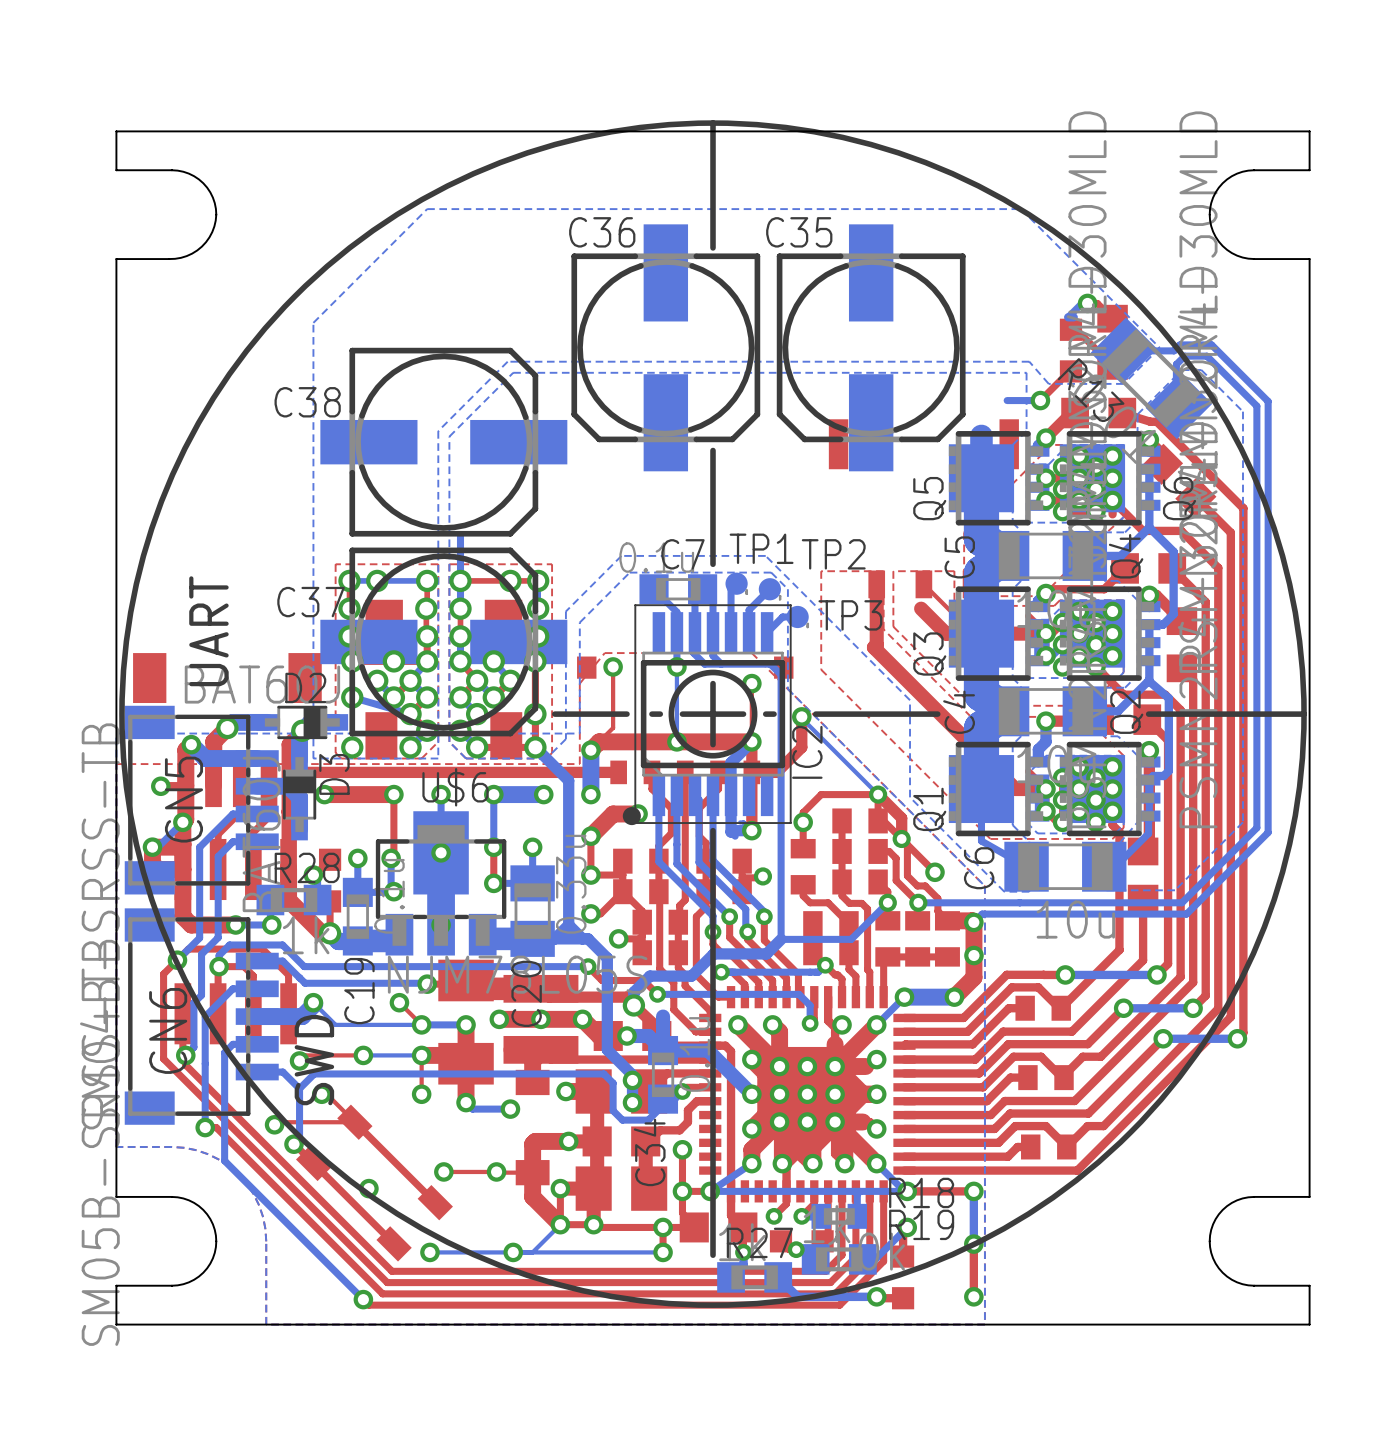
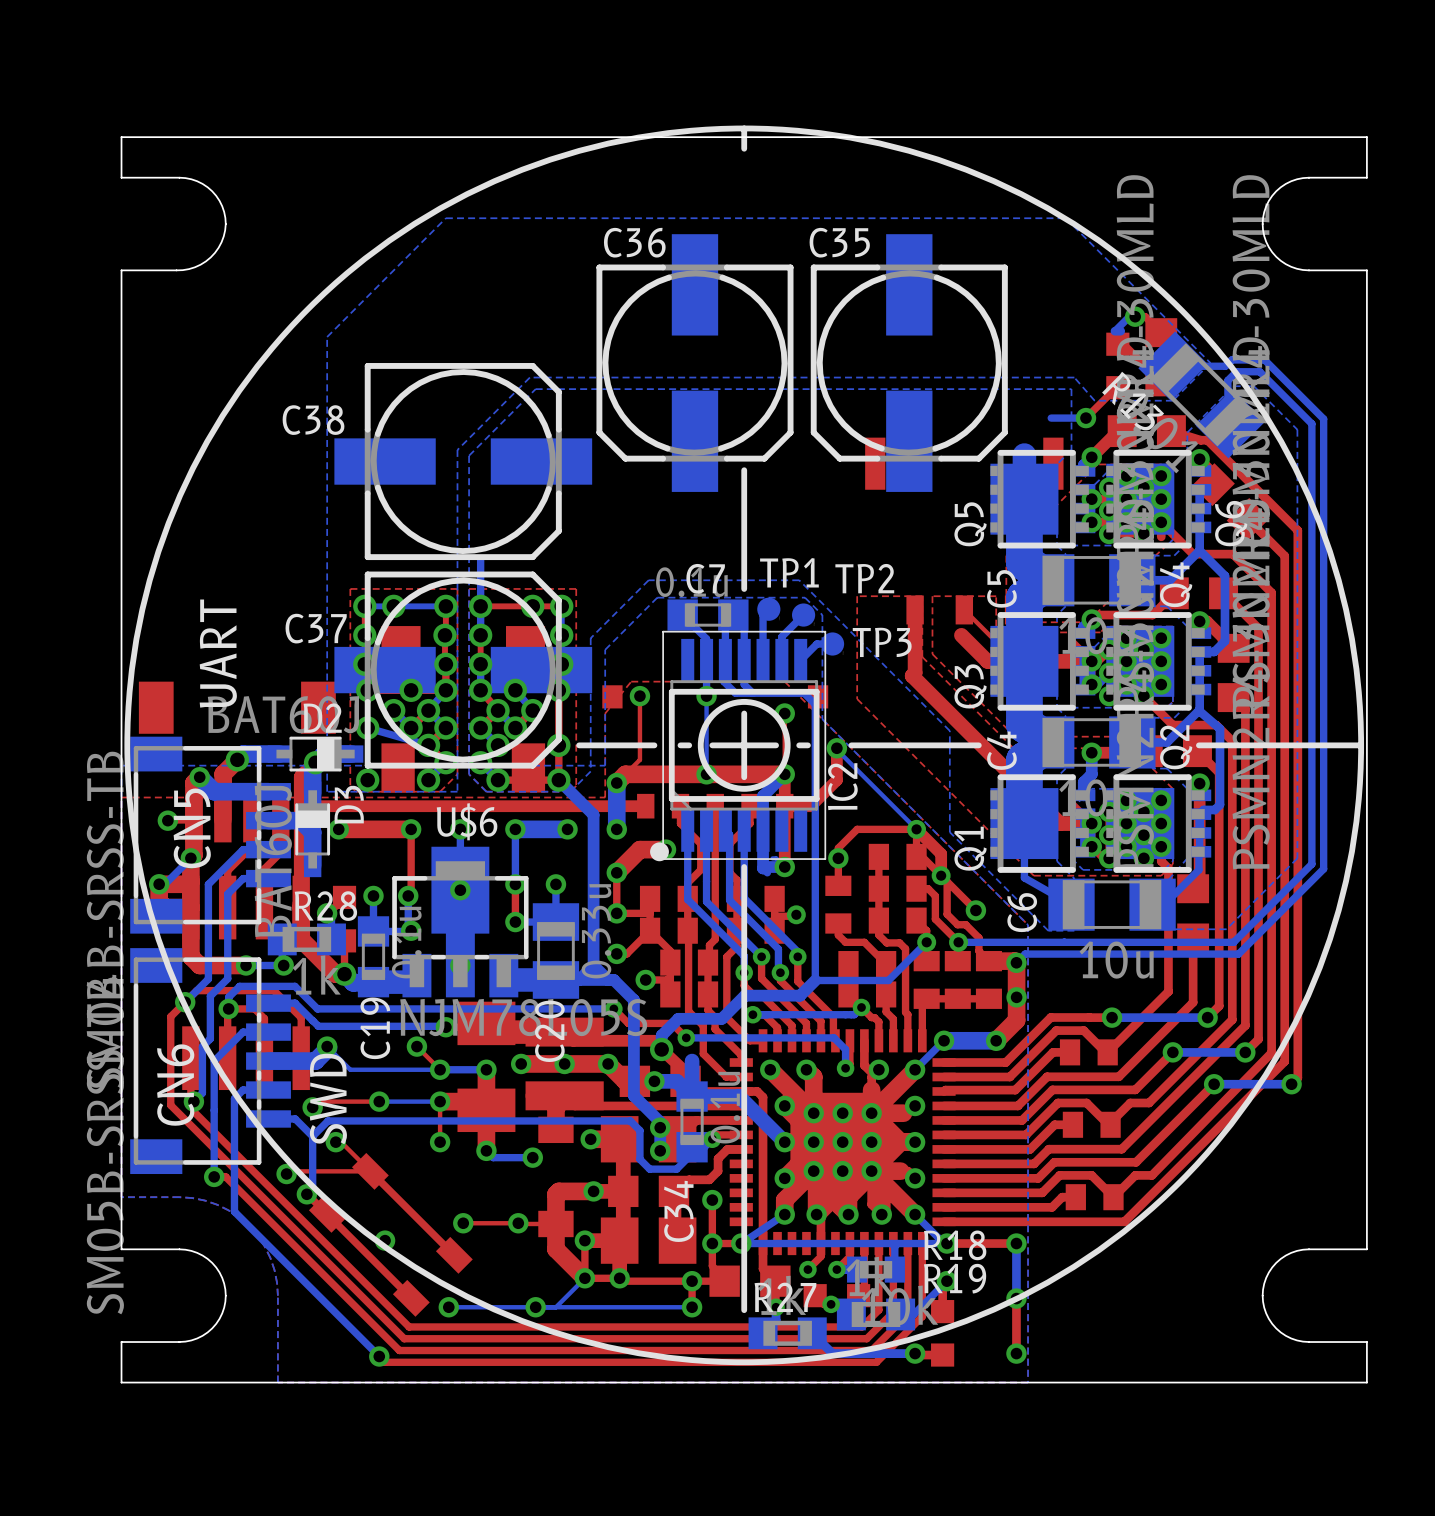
line: (713, 142) (713, 247) -> none

